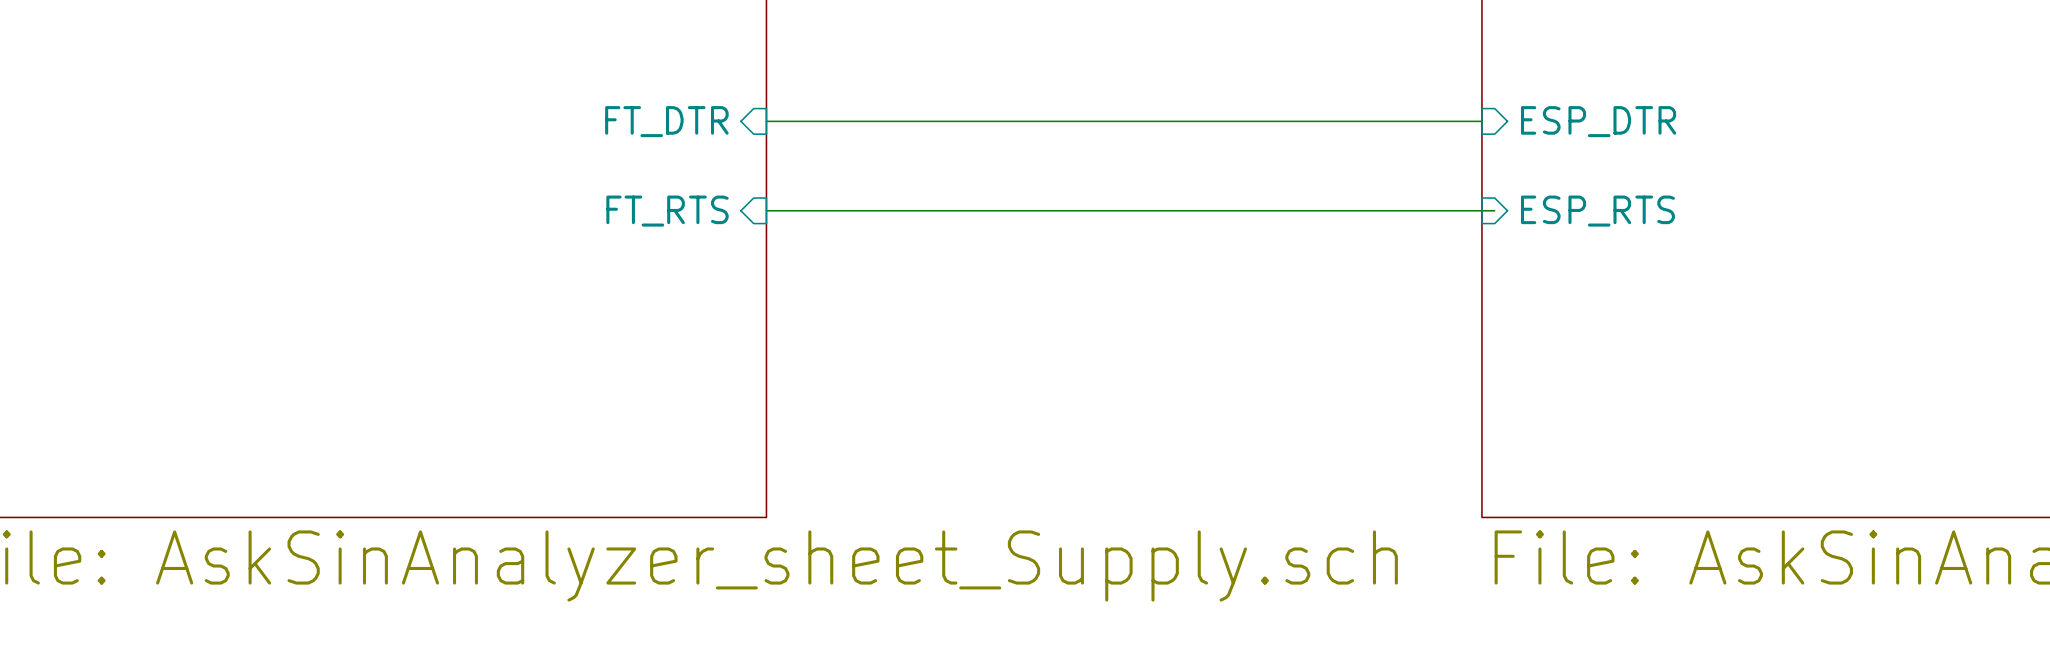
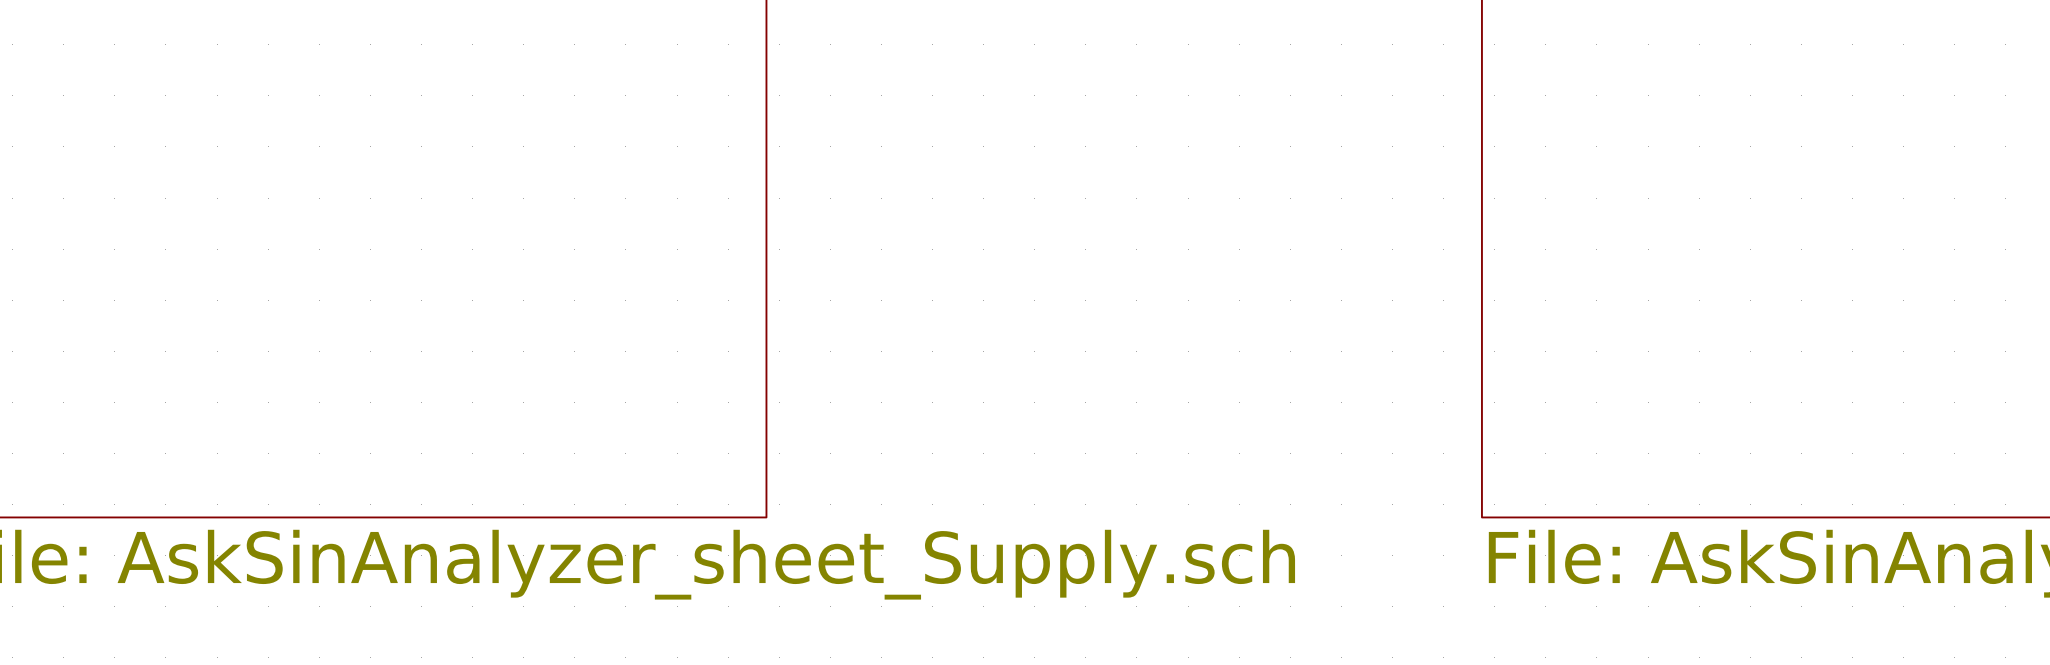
sheet pin: FT_DTR (666, 121) -> none
wire: (766, 121) (1481, 121) -> none
sheet pin: ESP_DTR (1598, 121) -> none
wire: (766, 210) (1494, 210) -> none
sheet pin: FT_RTS (667, 211) -> none
sheet pin: ESP_RTS (1597, 211) -> none

